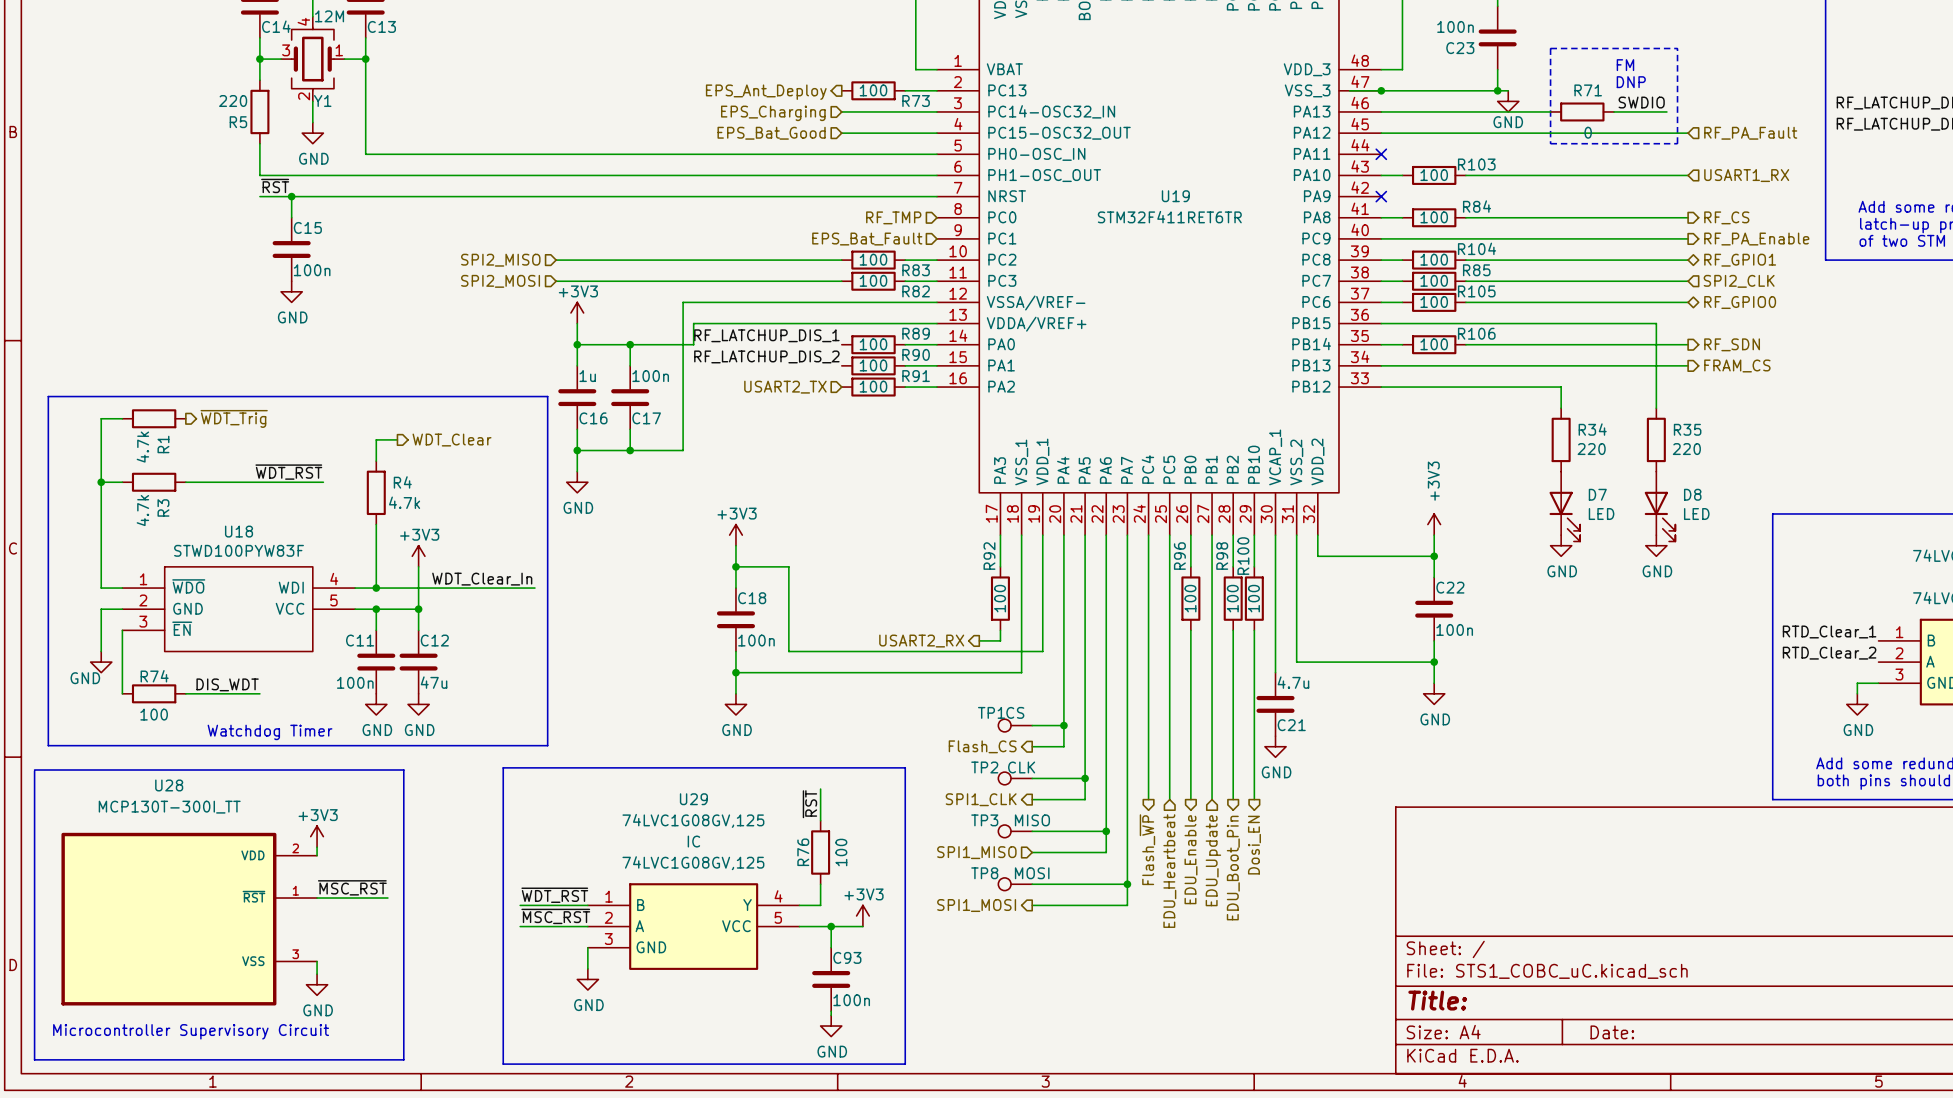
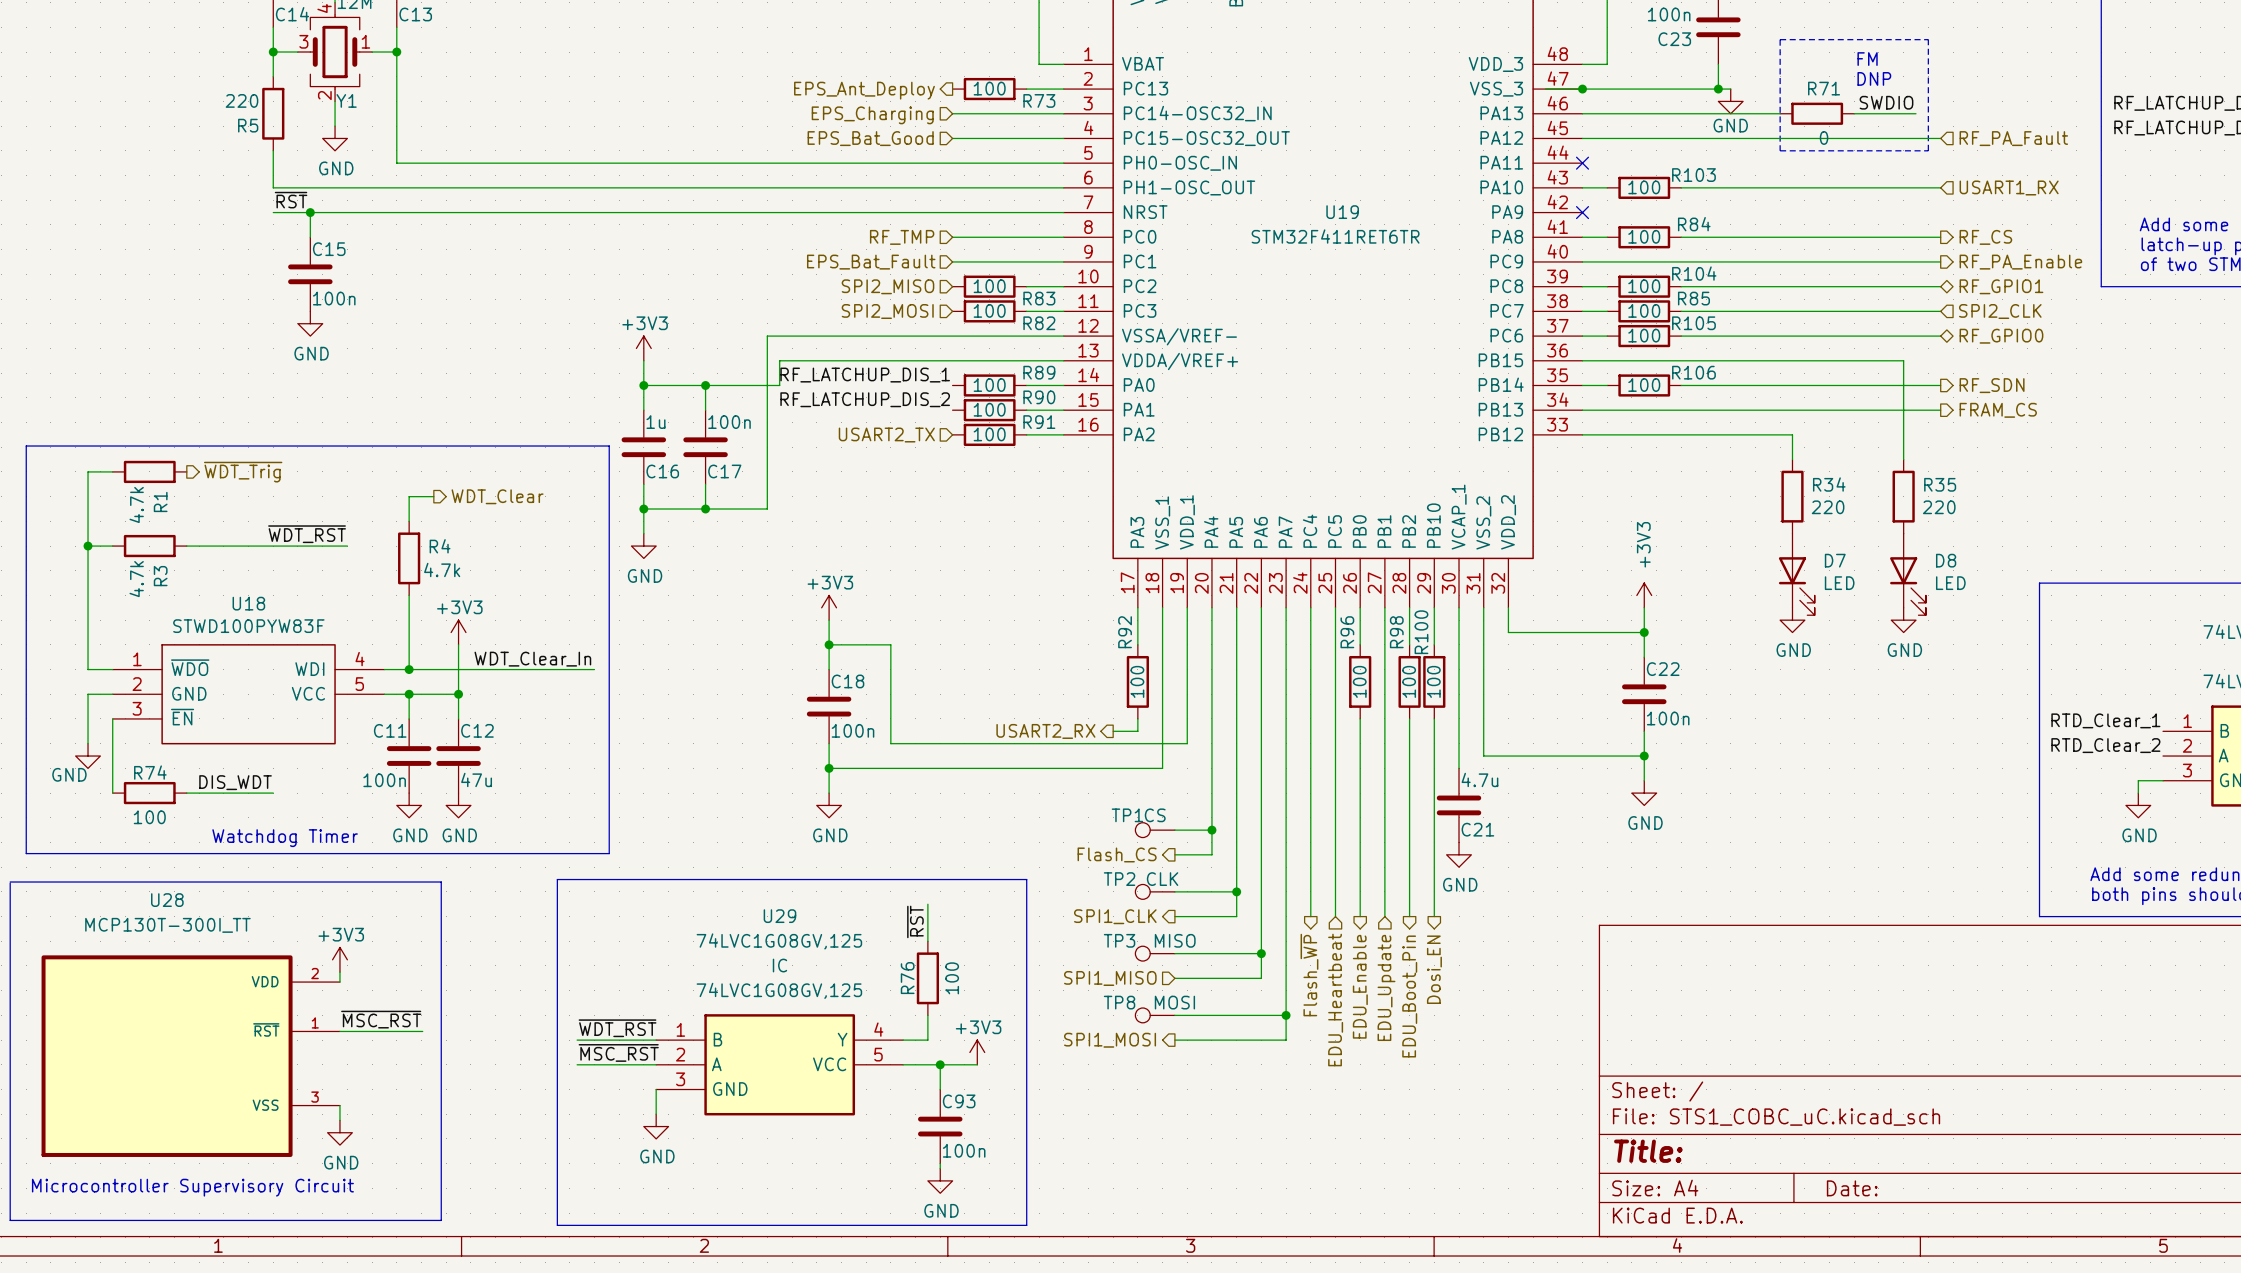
wire: none -> (952, 237) (1063, 237)
hierarchical label position: RF_TMP (893, 217) -> RF_TMP (902, 237)
wire: none -> (952, 261) (1063, 261)
hierarchical label position: EPS_Bat_Fault (867, 239) -> EPS_Bat_Fault (871, 262)
hierarchical label: SPI2_MISO (500, 260) -> none
wire: (556, 260) (841, 260) -> none
hierarchical label: none -> SPI2_MISO (888, 286)
hierarchical label: SPI2_MOSI (500, 281) -> none
wire: (556, 281) (841, 281) -> none
hierarchical label: none -> SPI2_MOSI (887, 311)

